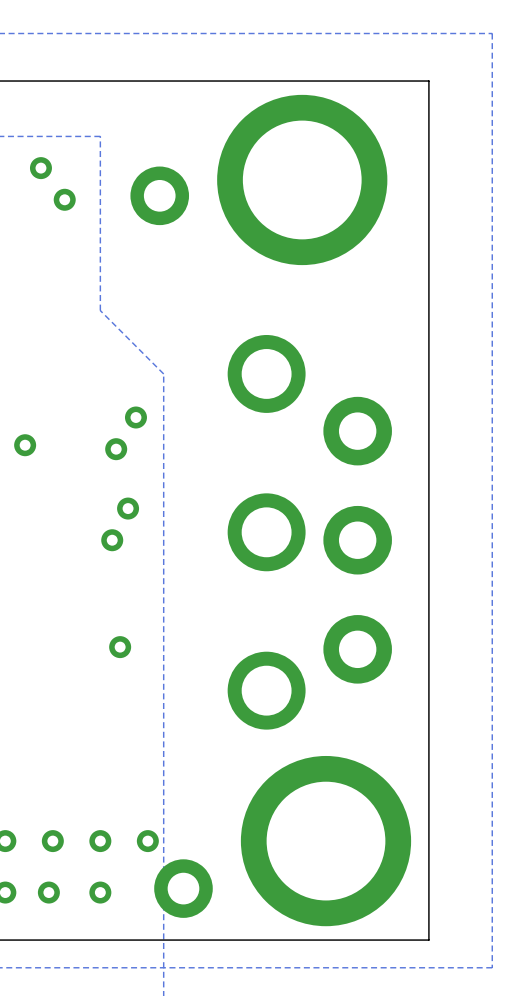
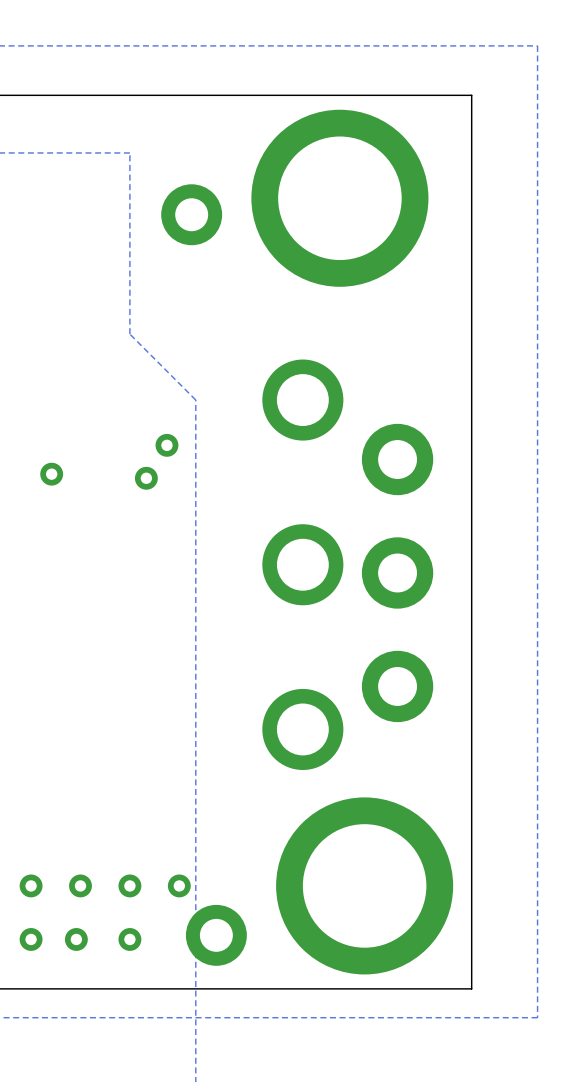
via: (40, 168) -> none
via: (64, 199) -> none
via: (128, 508) -> none
via: (112, 540) -> none
via: (120, 647) -> none

